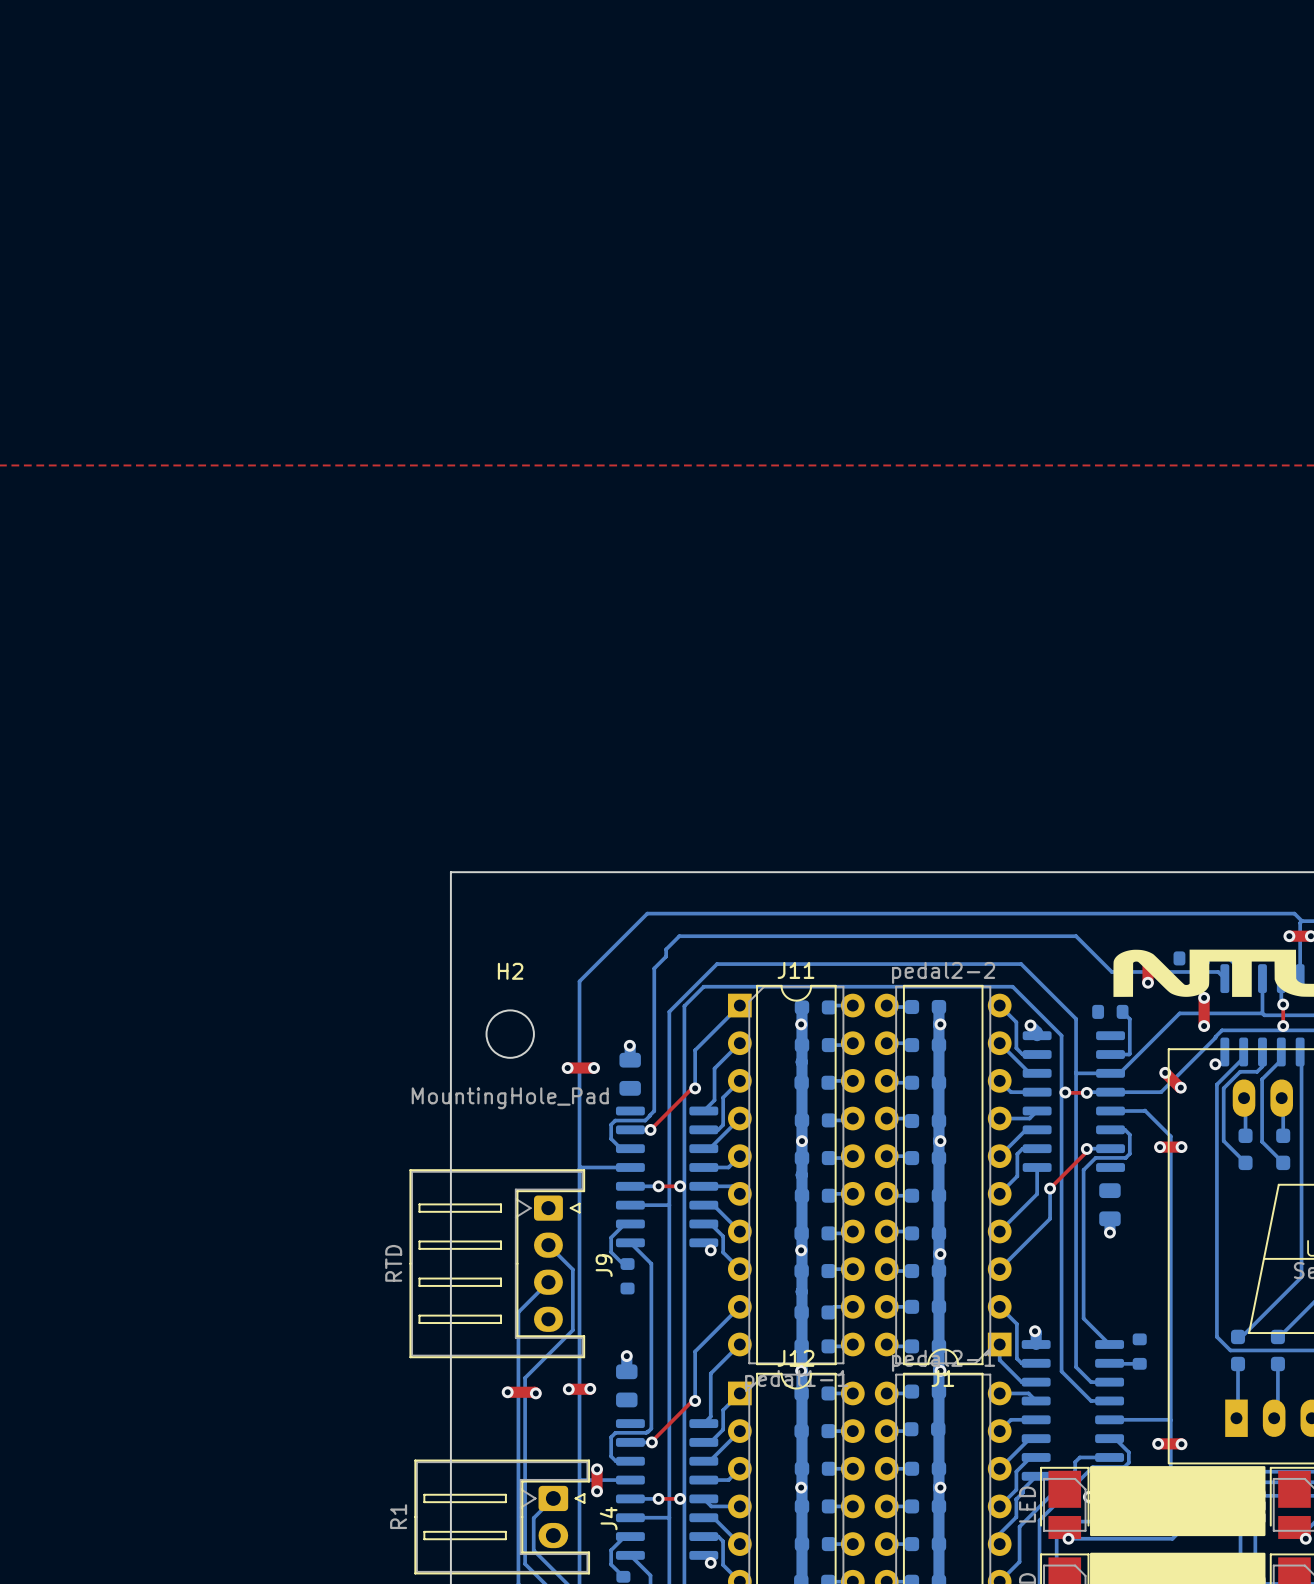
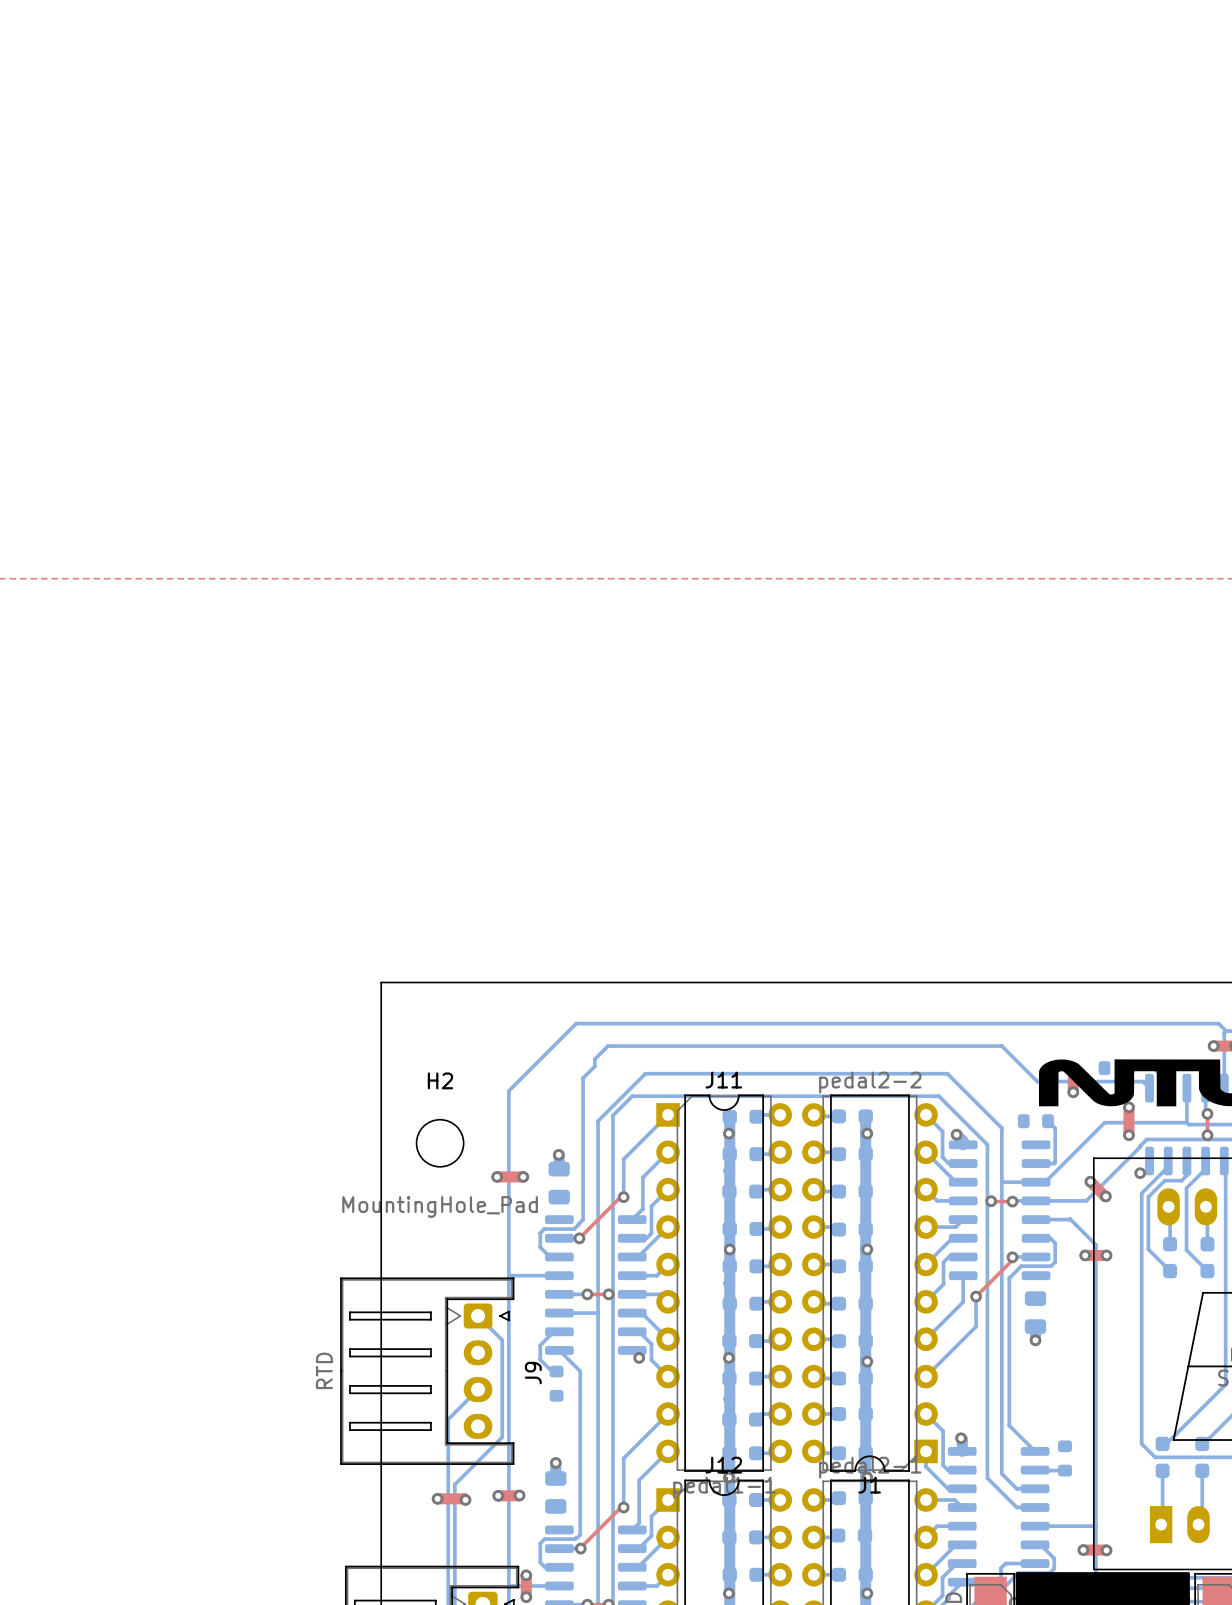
bottom track: (548, 1245) (572, 1269) -> (478, 1316) (502, 1340) (502, 1377)

